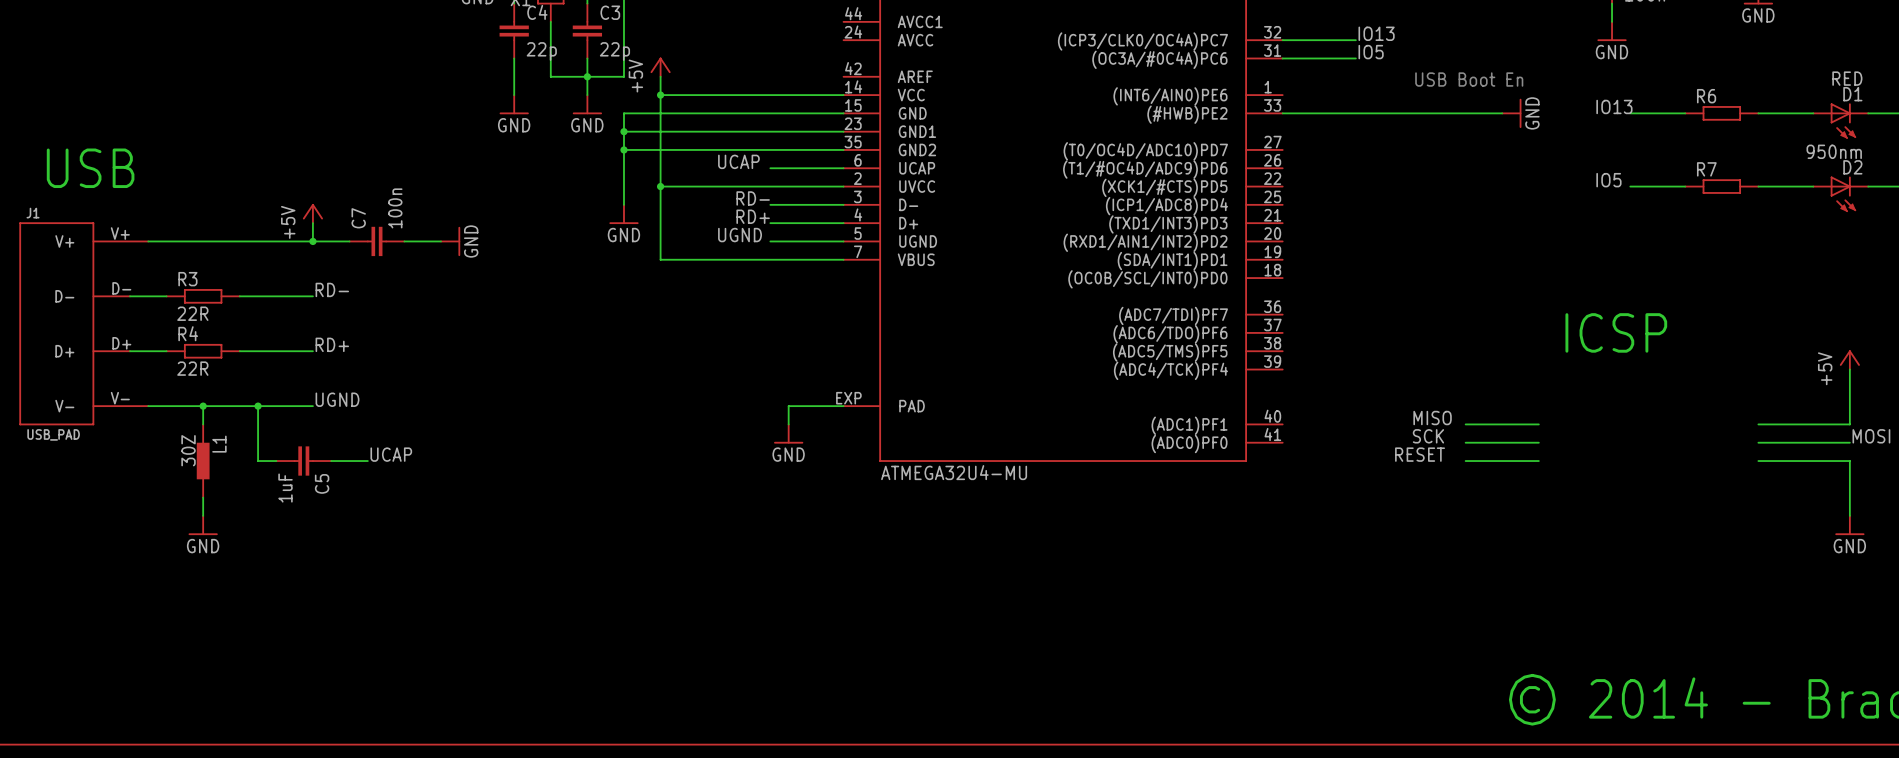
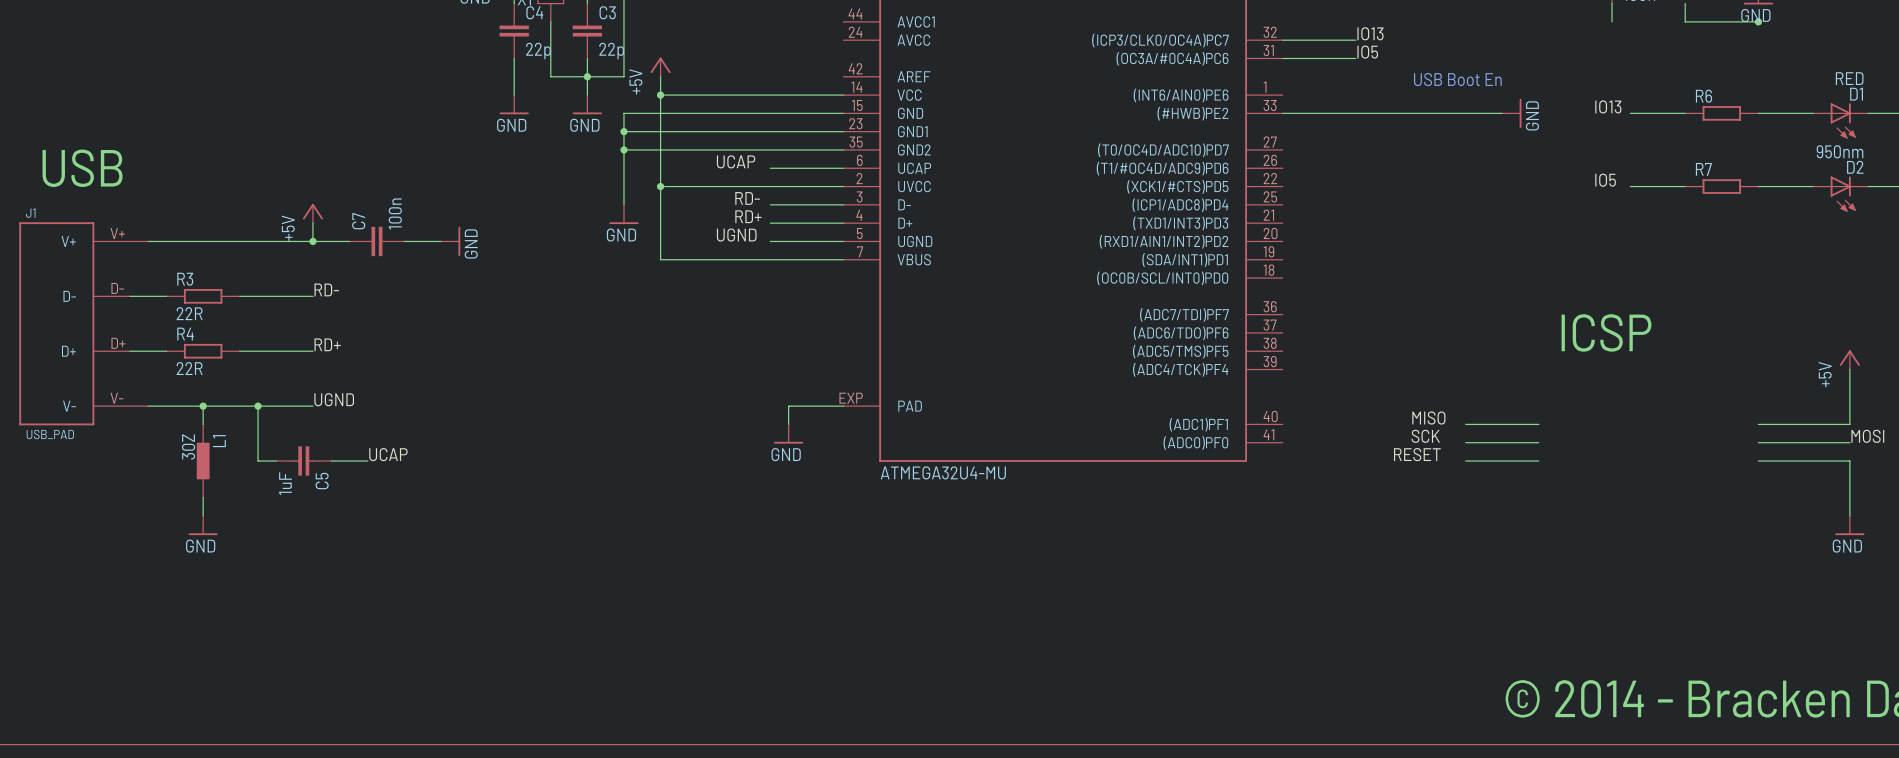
wire: none -> (1685, 3) (1685, 21) (1758, 21)
junction: none -> (1758, 21)
power symbol: GND (1612, 31) -> none

